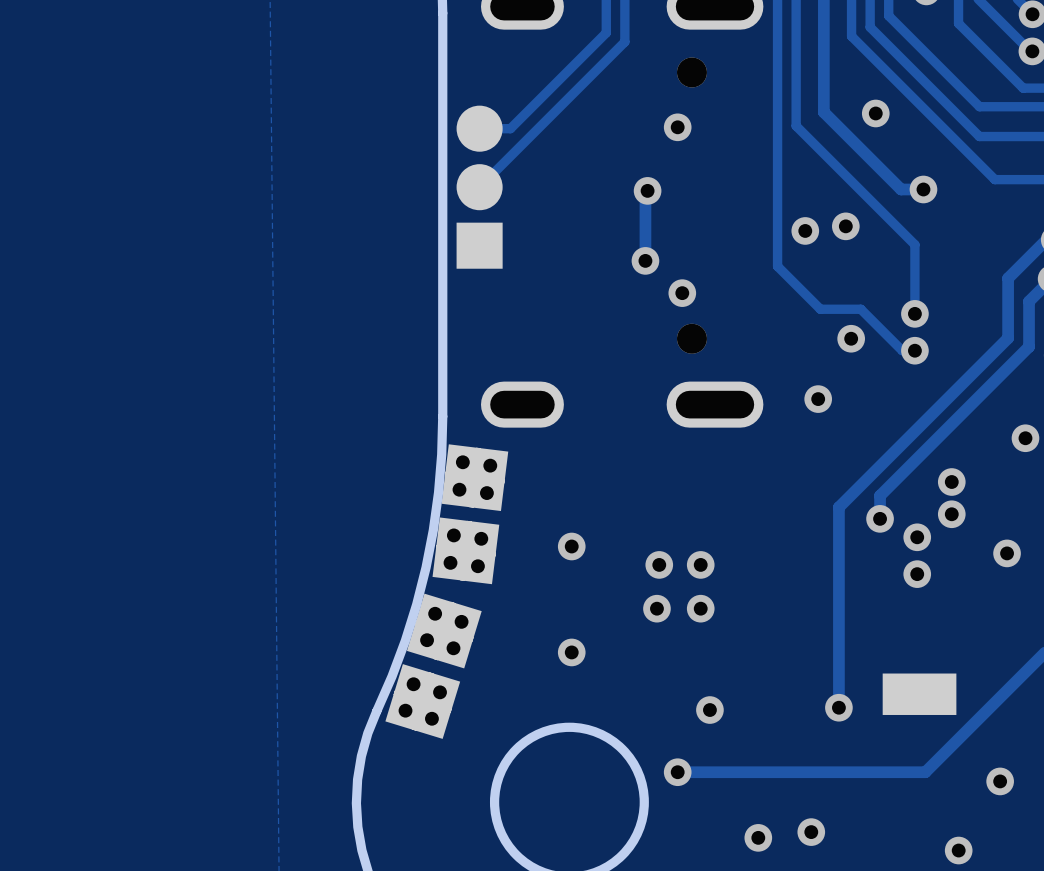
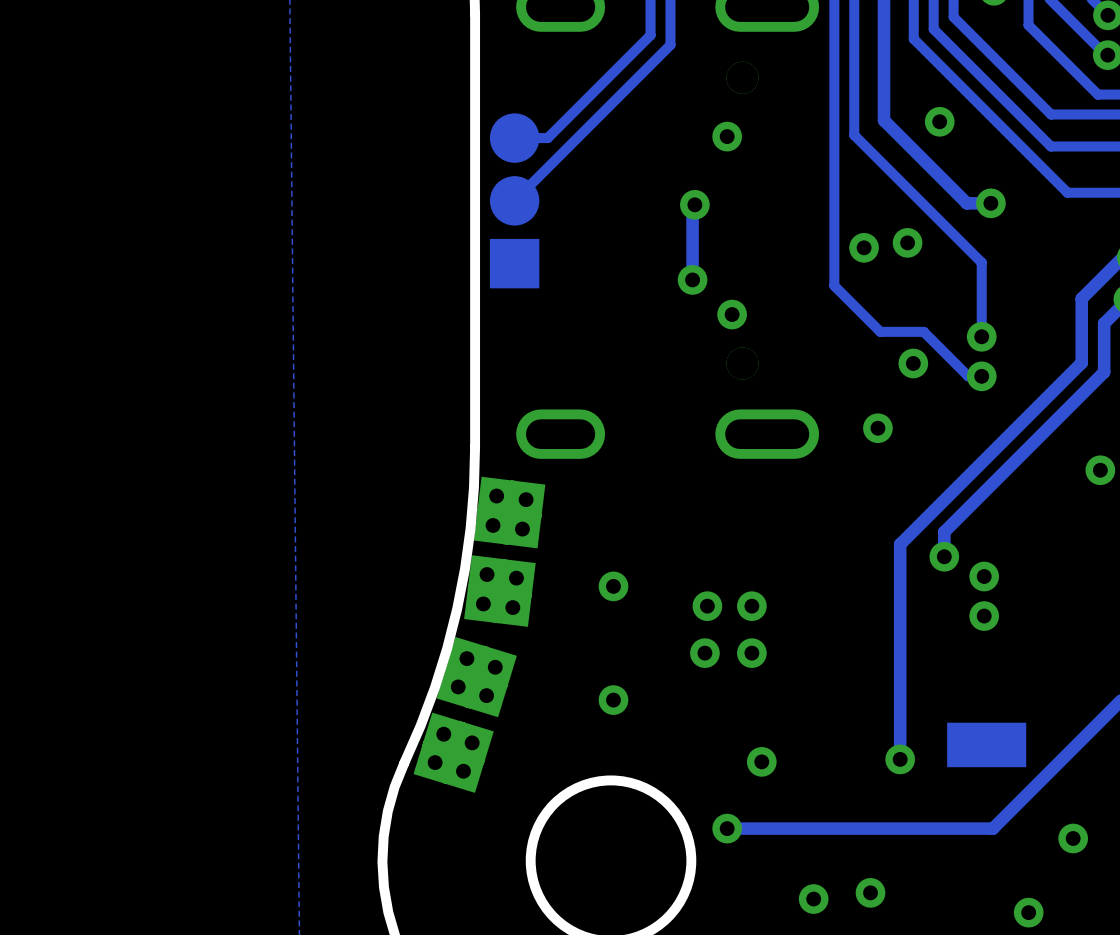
via: (951, 482) -> none
via: (951, 514) -> none
via: (1007, 553) -> none

